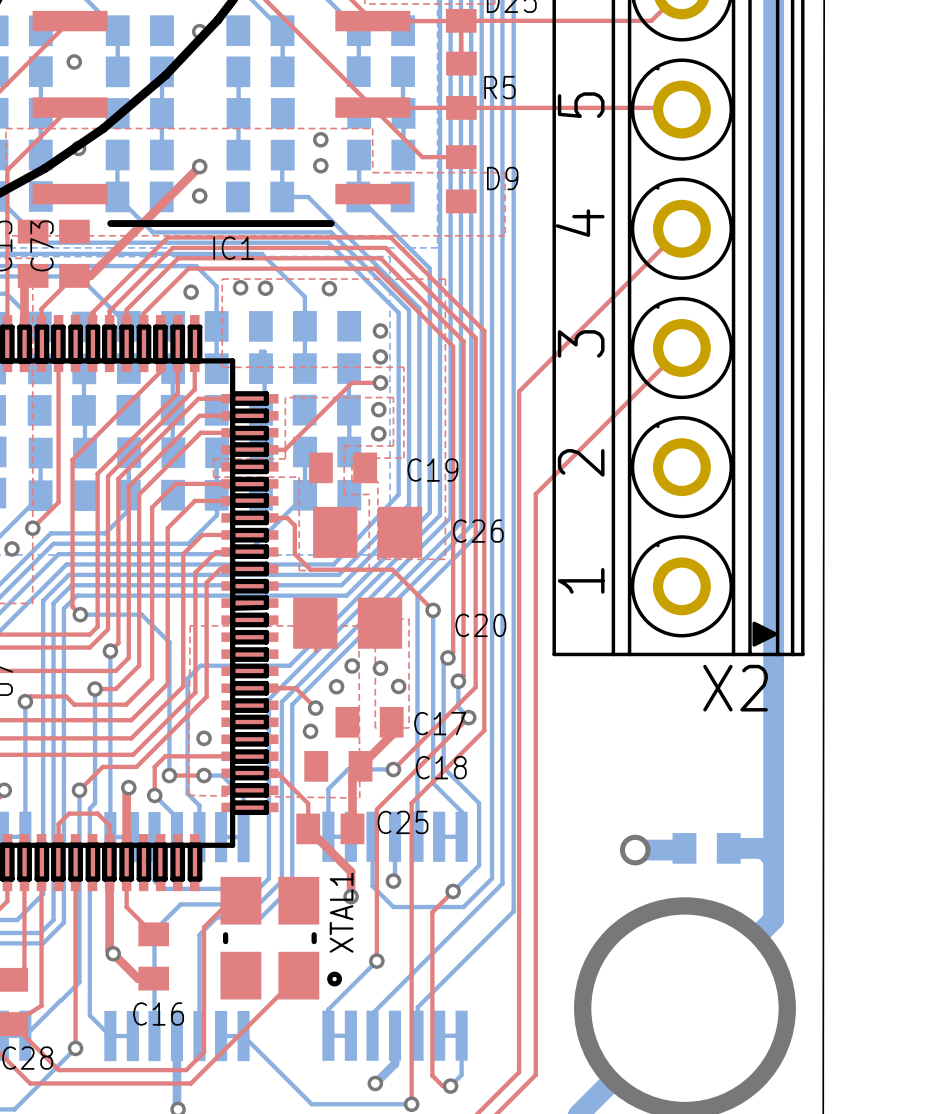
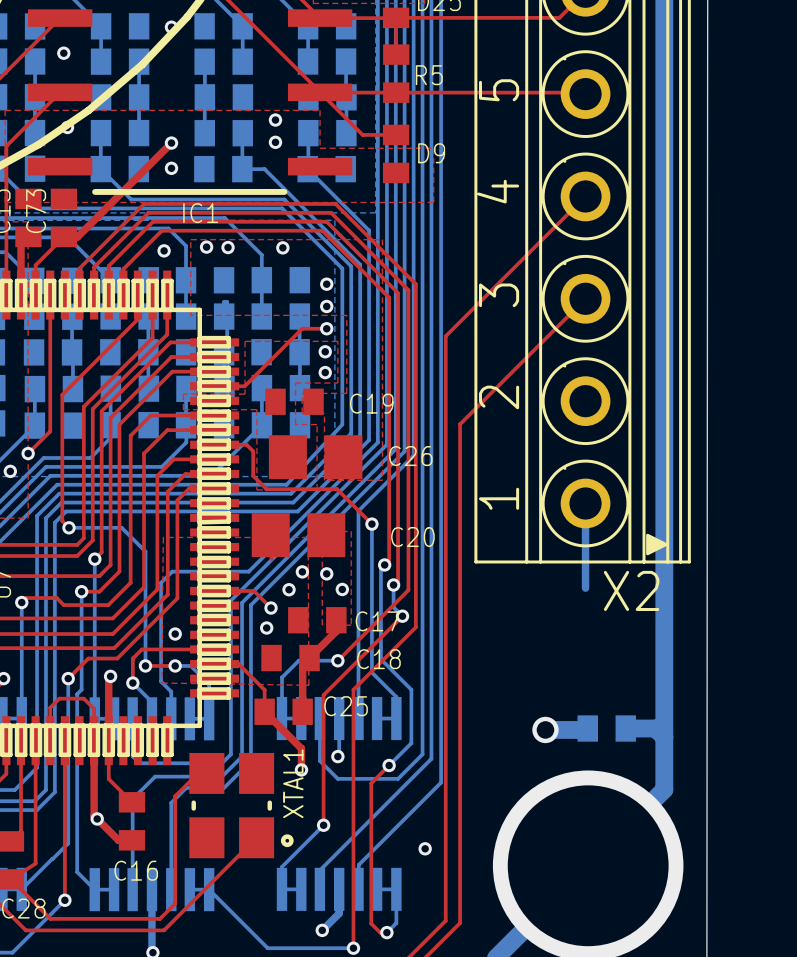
bottom track: none -> (585, 503) (585, 588)
via: none -> (425, 848)

